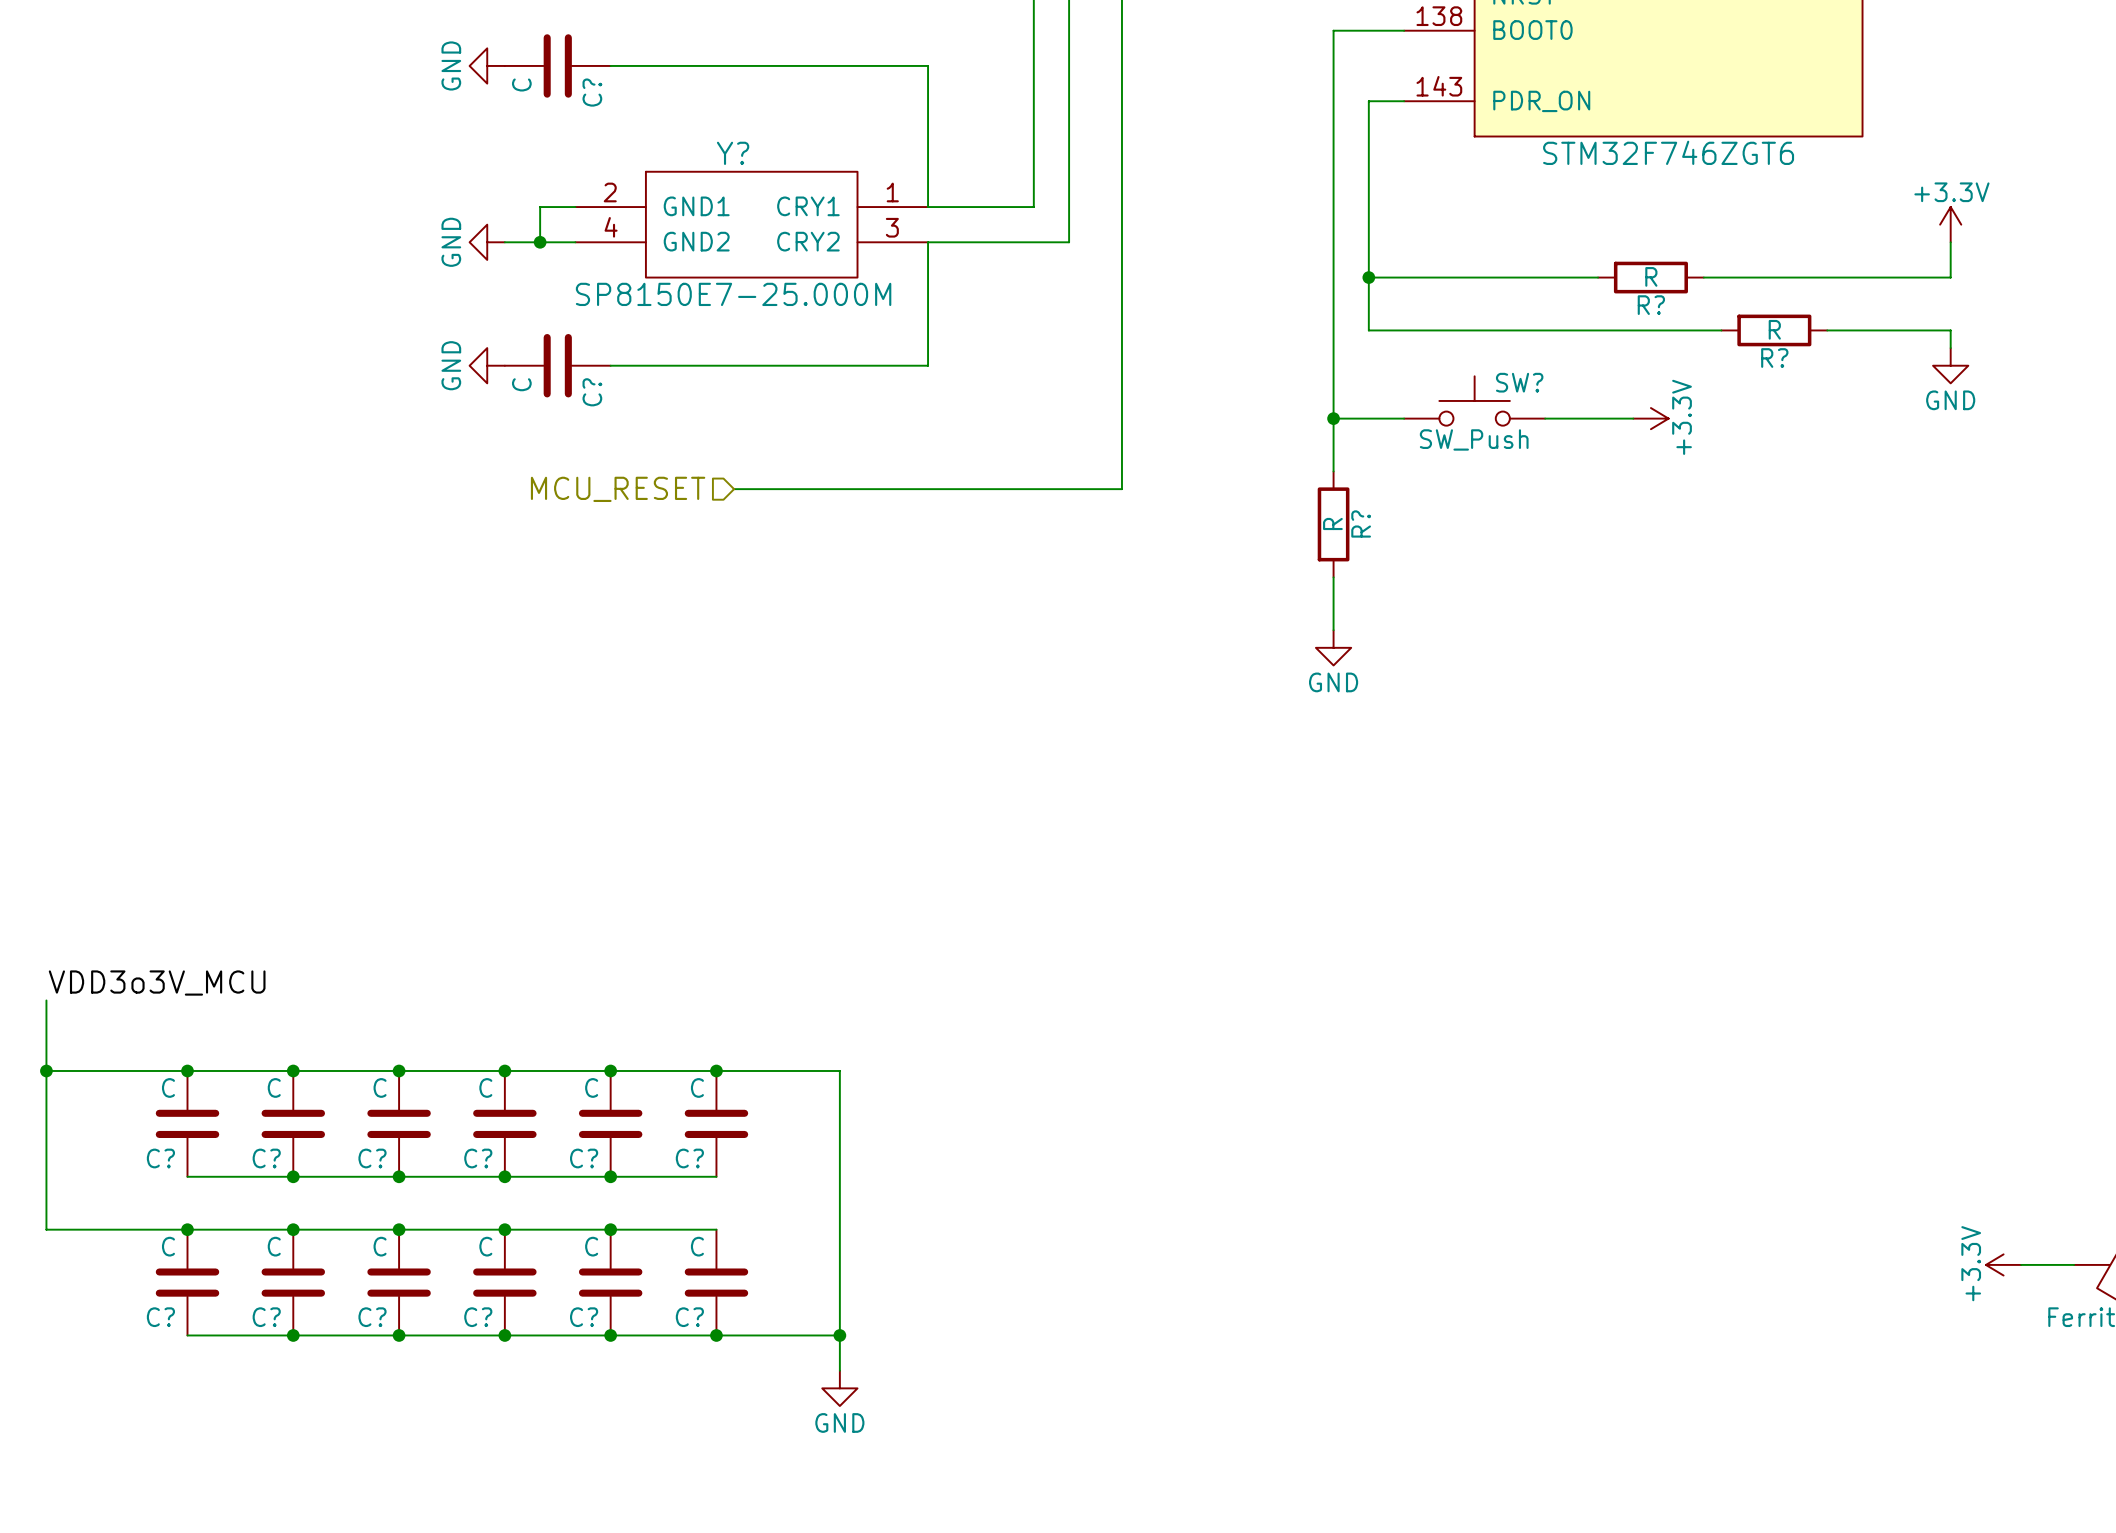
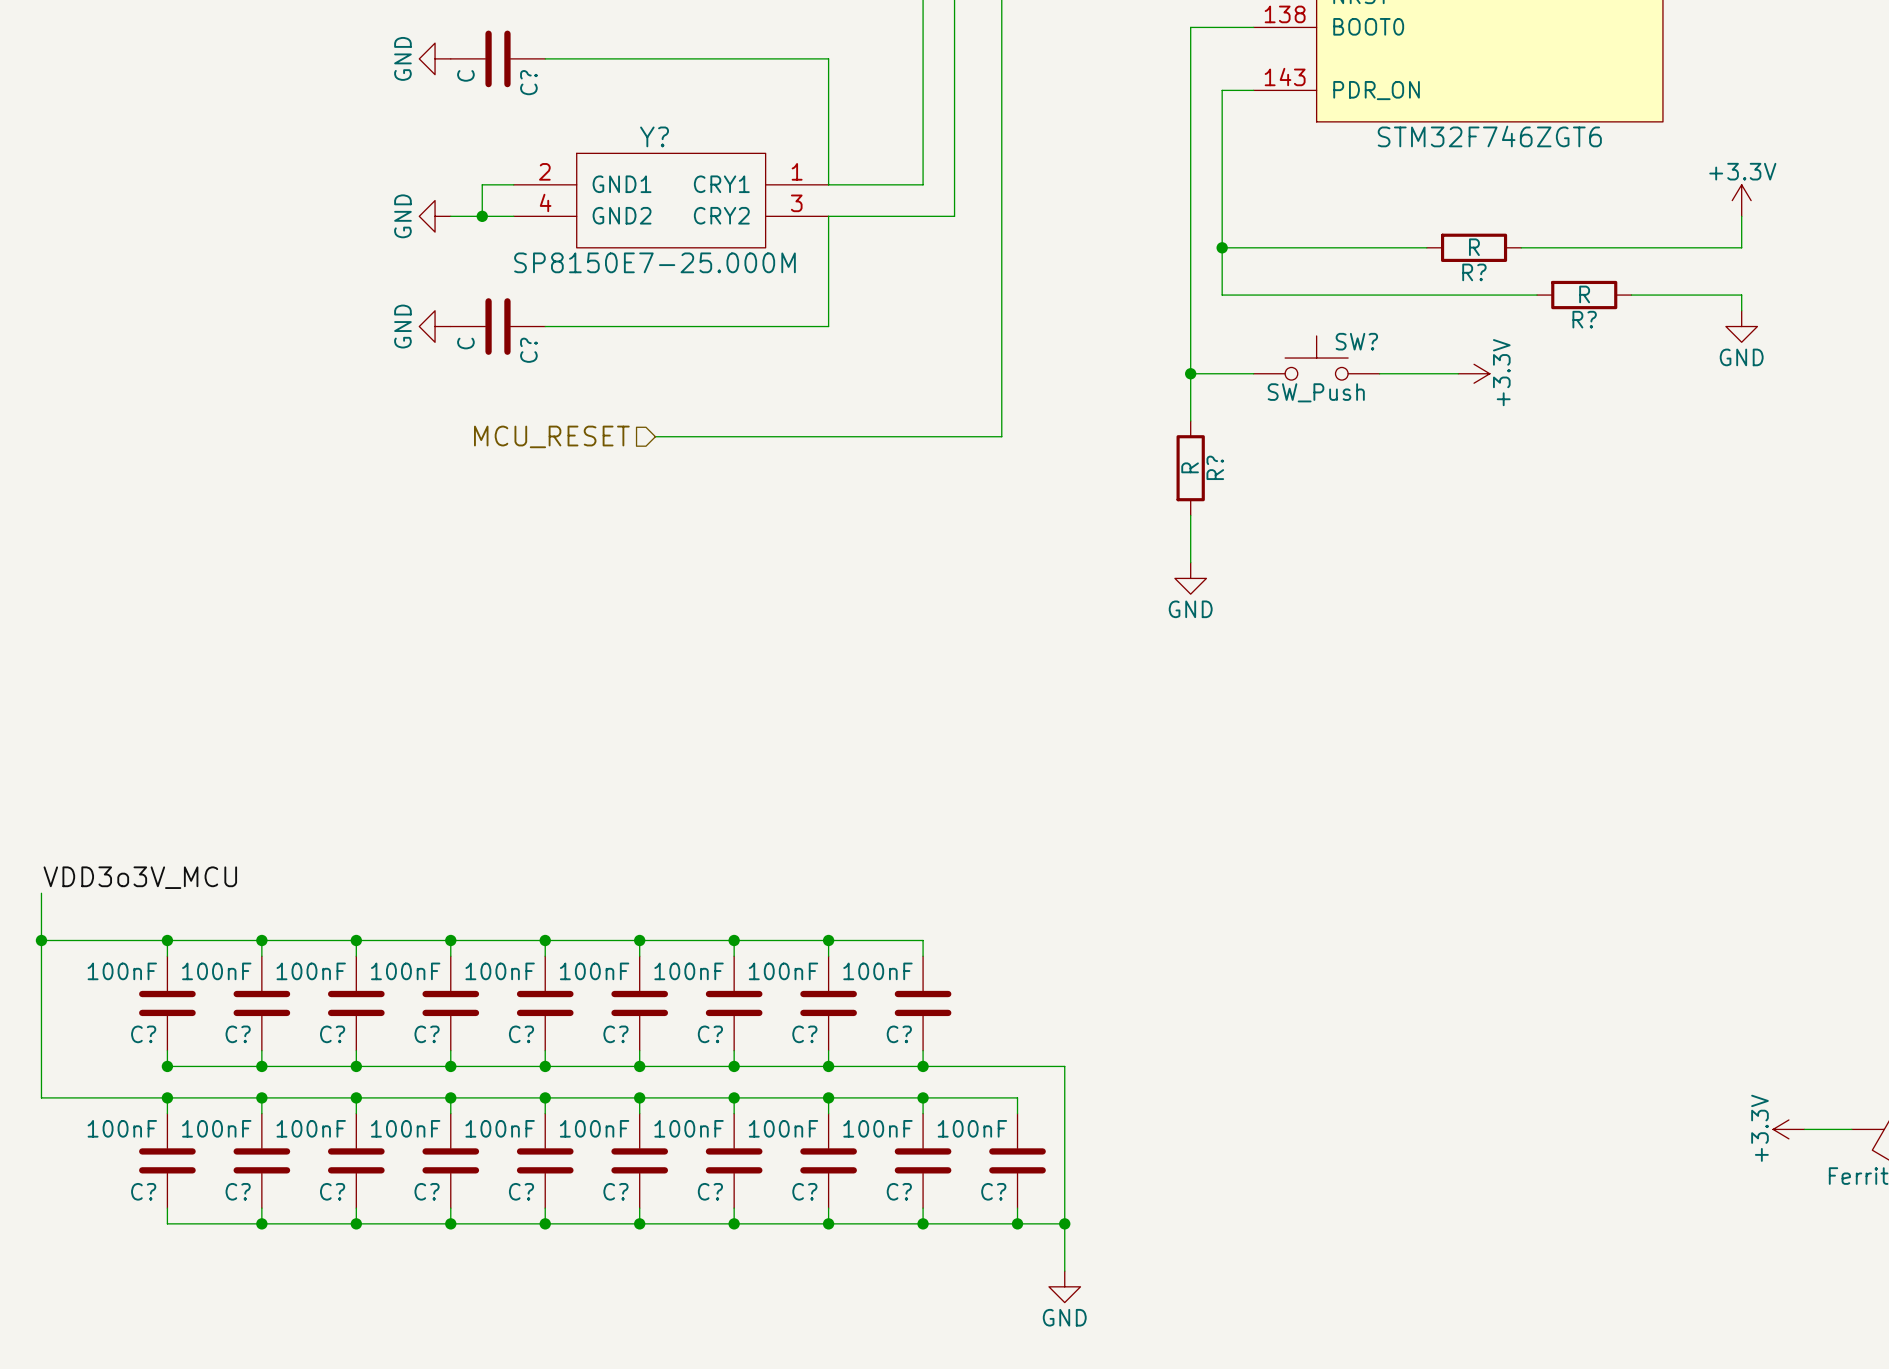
wire: none -> (41, 940) (923, 940) (923, 956)
wire: none -> (167, 940) (167, 956)
wire: none -> (261, 940) (261, 956)
wire: none -> (356, 940) (356, 956)
wire: none -> (450, 940) (450, 956)
wire: none -> (545, 940) (545, 956)
wire: none -> (639, 940) (639, 956)
wire: none -> (734, 940) (734, 956)
junction: none -> (734, 940)
wire: none -> (828, 940) (828, 956)
junction: none -> (828, 940)
wire: (46, 1070) (839, 1070) (839, 1370) -> none
junction position: (46, 1070) -> (41, 940)
junction position: (187, 1070) -> (167, 940)
junction position: (293, 1070) -> (261, 940)
junction position: (399, 1070) -> (356, 940)
junction position: (504, 1070) -> (450, 940)
junction position: (610, 1070) -> (545, 940)
junction position: (716, 1070) -> (639, 940)
C? value: C (168, 1087) -> 100nF (122, 971)
C? value: C (274, 1087) -> 100nF (216, 971)
C? value: C (380, 1087) -> 100nF (311, 971)
C? value: C (485, 1087) -> 100nF (405, 971)
C? value: C (591, 1087) -> 100nF (500, 971)
C? value: C (697, 1087) -> 100nF (594, 971)
C?: none -> 100nF (734, 1003)
C?: none -> 100nF (828, 1003)
C?: none -> 100nF (923, 1003)
wire: (187, 1176) (716, 1176) -> (639, 1066) (639, 1050)
wire: none -> (167, 1050) (167, 1066) (1064, 1066) (1064, 1271)
wire: none -> (261, 1050) (261, 1066)
junction position: (293, 1176) -> (261, 1066)
wire: none -> (356, 1050) (356, 1066)
junction position: (399, 1176) -> (356, 1066)
wire: none -> (450, 1050) (450, 1066)
junction position: (504, 1176) -> (450, 1066)
wire: none -> (545, 1050) (545, 1066)
junction position: (610, 1176) -> (545, 1066)
wire: none -> (734, 1050) (734, 1066)
wire: none -> (828, 1050) (828, 1066)
wire: none -> (923, 1050) (923, 1066)
junction: none -> (167, 1066)
junction: none -> (639, 1066)
junction: none -> (734, 1066)
junction: none -> (828, 1066)
junction: none -> (923, 1066)
junction: none -> (639, 1097)
wire: none -> (734, 1097) (734, 1113)
junction: none -> (734, 1097)
wire: none -> (828, 1097) (828, 1113)
junction: none -> (828, 1097)
wire: none -> (923, 1097) (923, 1113)
junction: none -> (923, 1097)
wire: none -> (639, 1113) (639, 1097) (1017, 1097) (1017, 1113)
C?: C (187, 1282) -> none
C?: C (293, 1282) -> none
C?: C (399, 1282) -> none
C?: C (504, 1282) -> none
C?: C (610, 1282) -> none
C?: C (716, 1282) -> none
C?: none -> 100nF (167, 1160)
C?: none -> 100nF (261, 1160)
C?: none -> 100nF (356, 1160)
C?: none -> 100nF (450, 1160)
C?: none -> 100nF (545, 1160)
C?: none -> 100nF (639, 1160)
C?: none -> 100nF (734, 1160)
C?: none -> 100nF (828, 1160)
C?: none -> 100nF (923, 1160)
C?: none -> 100nF (1017, 1160)
wire: (187, 1335) (839, 1335) -> none
junction position: (293, 1335) -> (261, 1223)
junction position: (399, 1335) -> (356, 1223)
junction position: (504, 1335) -> (450, 1223)
junction position: (610, 1335) -> (545, 1223)
junction position: (716, 1335) -> (639, 1223)
junction position: (839, 1335) -> (734, 1223)
wire: none -> (167, 1208) (167, 1223) (1064, 1223)
wire: none -> (261, 1208) (261, 1223)
wire: none -> (356, 1208) (356, 1223)
wire: none -> (450, 1208) (450, 1223)
wire: none -> (545, 1208) (545, 1223)
wire: none -> (639, 1208) (639, 1223)
wire: none -> (734, 1208) (734, 1223)
wire: none -> (828, 1208) (828, 1223)
wire: none -> (923, 1208) (923, 1223)
wire: none -> (1017, 1208) (1017, 1223)
junction: none -> (828, 1223)
junction: none -> (923, 1223)
junction: none -> (1017, 1223)
junction: none -> (1064, 1223)
power symbol: GND (839, 1388) -> none
power symbol: none -> GND (1064, 1286)

